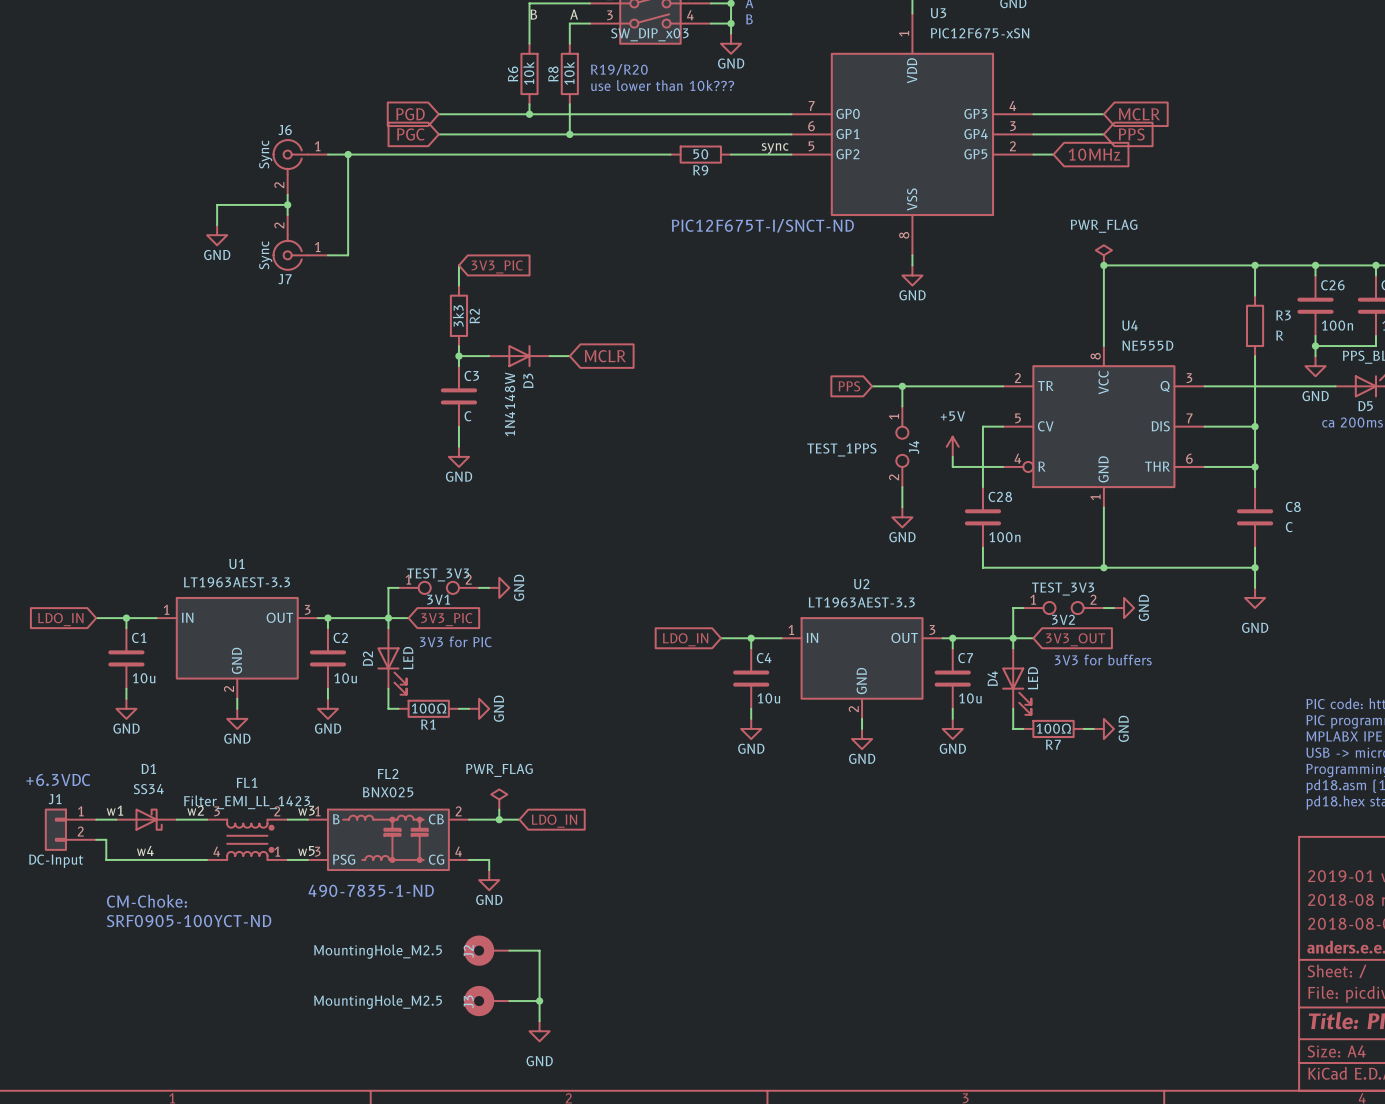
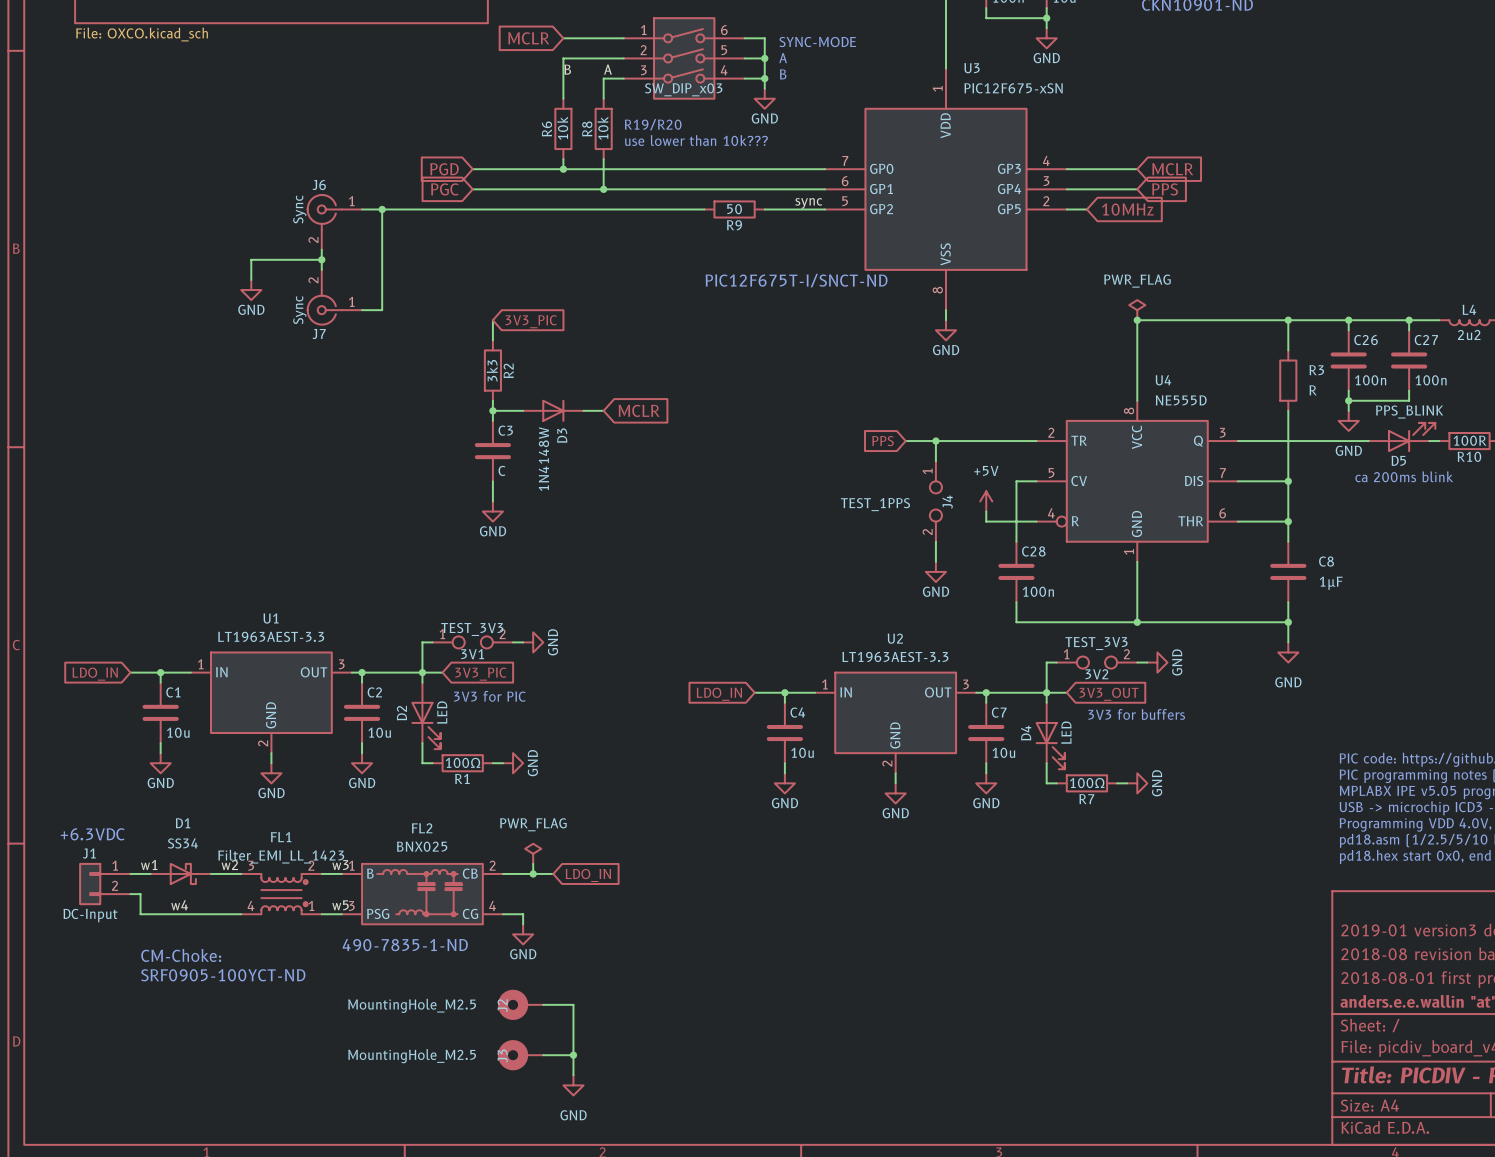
C8 value: C (1289, 527) -> 1µF (1331, 583)

